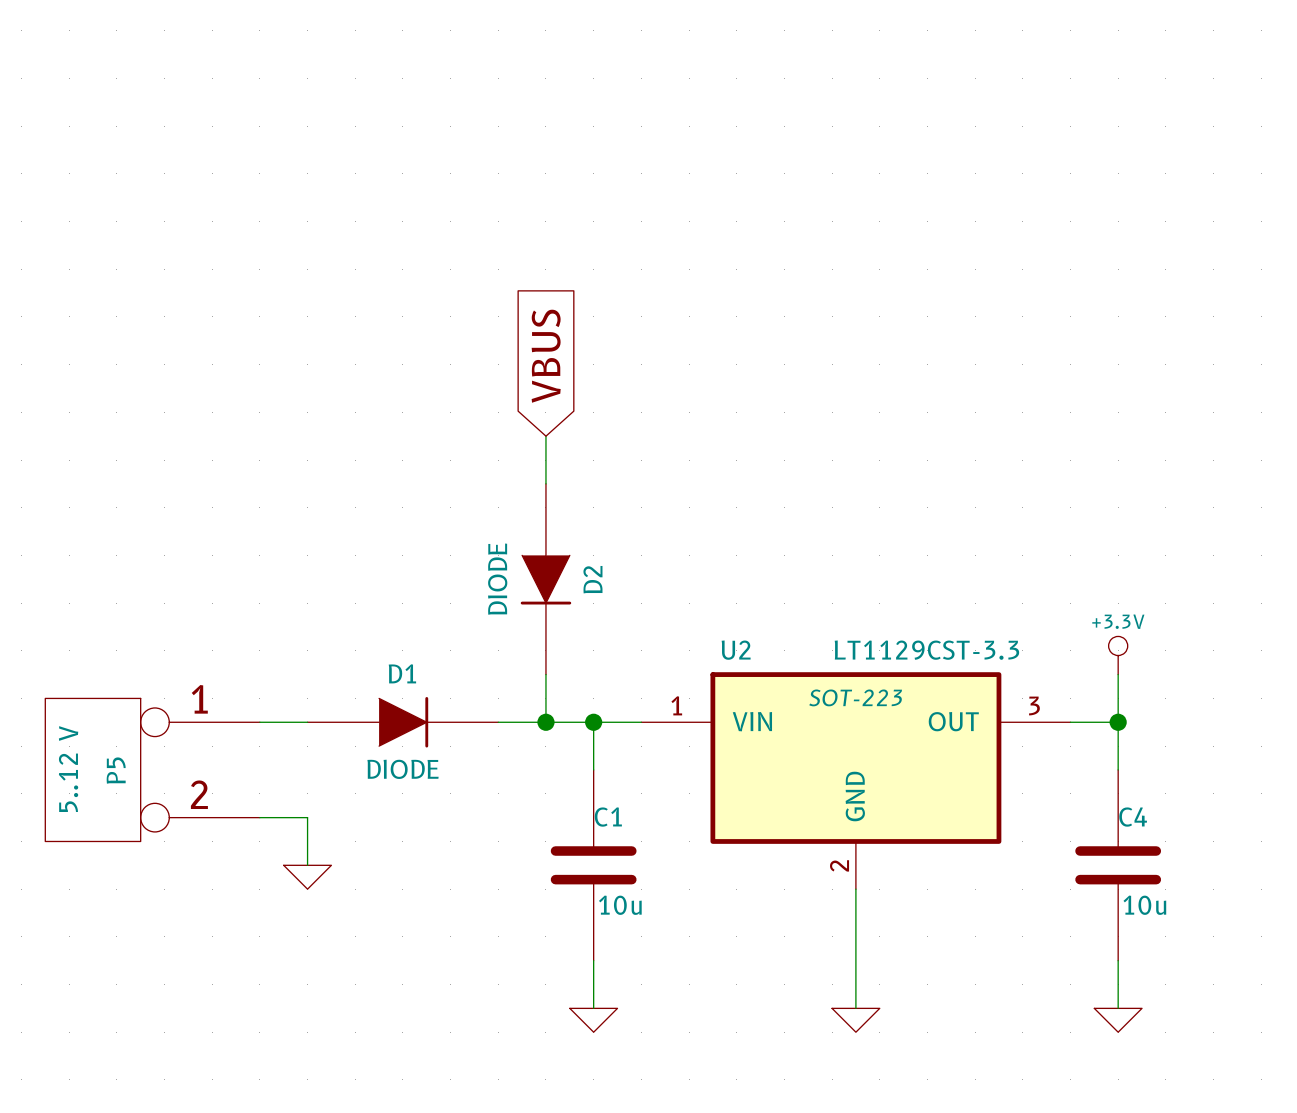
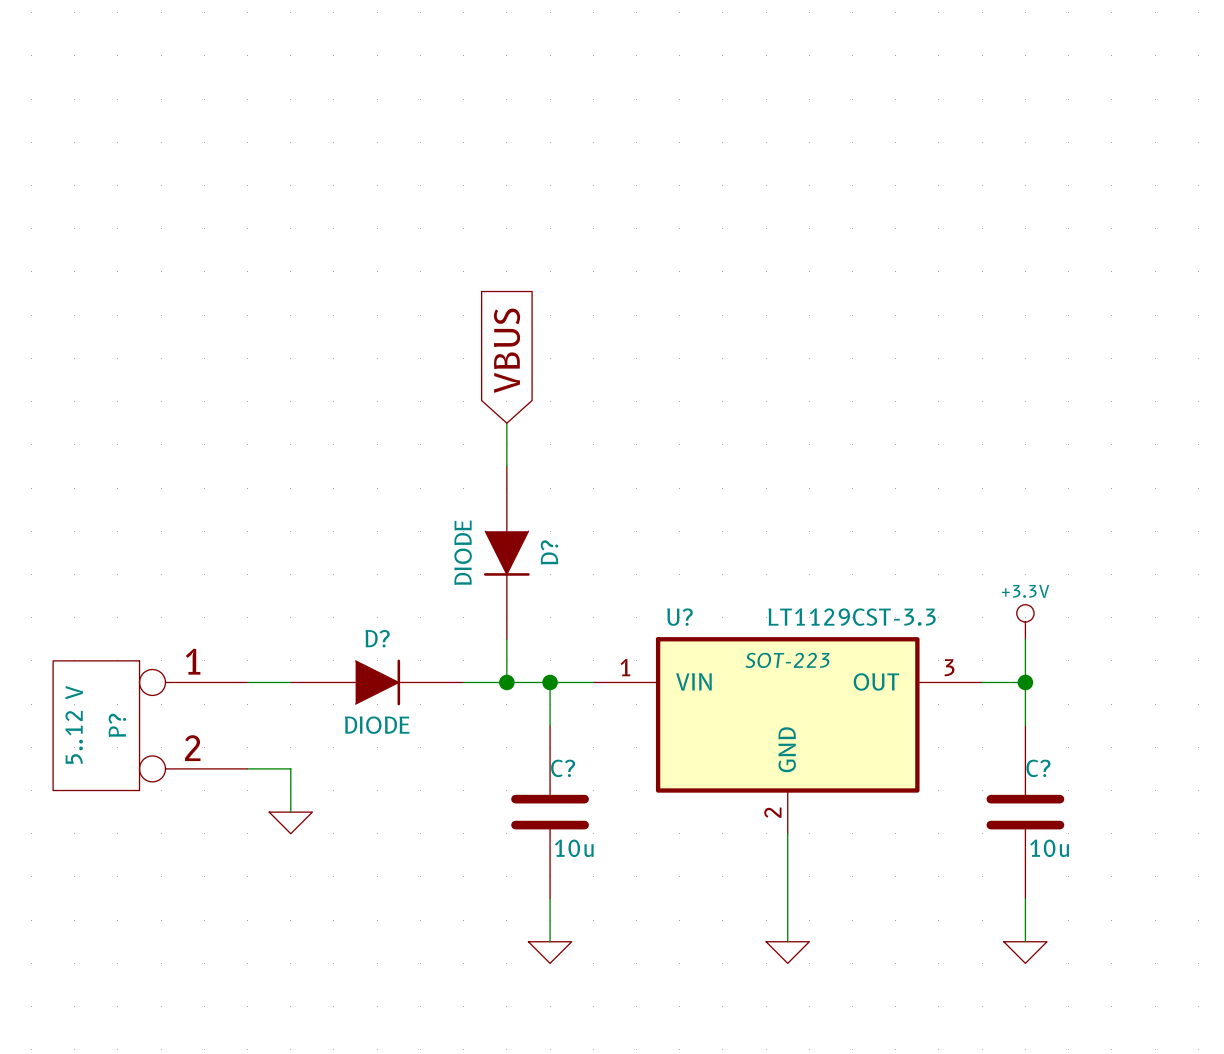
D2 name: D2 (592, 579) -> D? (549, 552)
U2 name: U2 (736, 650) -> U? (679, 617)
D1 name: D1 (402, 673) -> D? (377, 638)
P5 name: P5 (116, 770) -> P? (117, 725)
C1 name: C1 (608, 817) -> C? (563, 768)
C4 name: C4 (1133, 817) -> C? (1038, 768)

